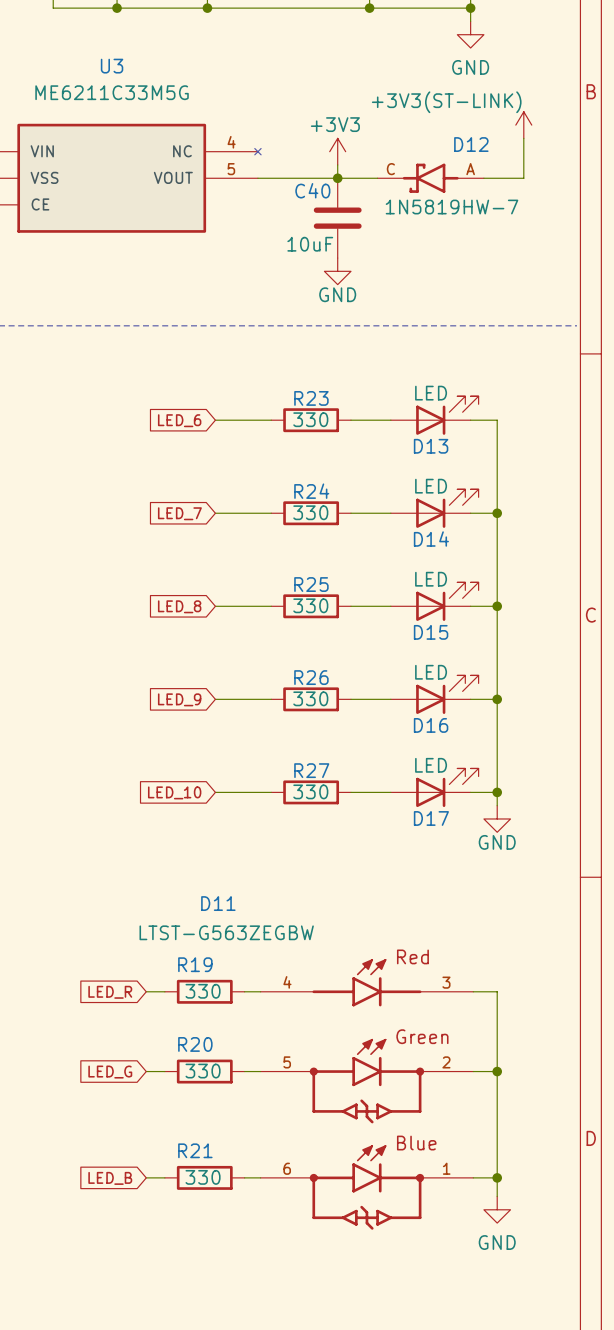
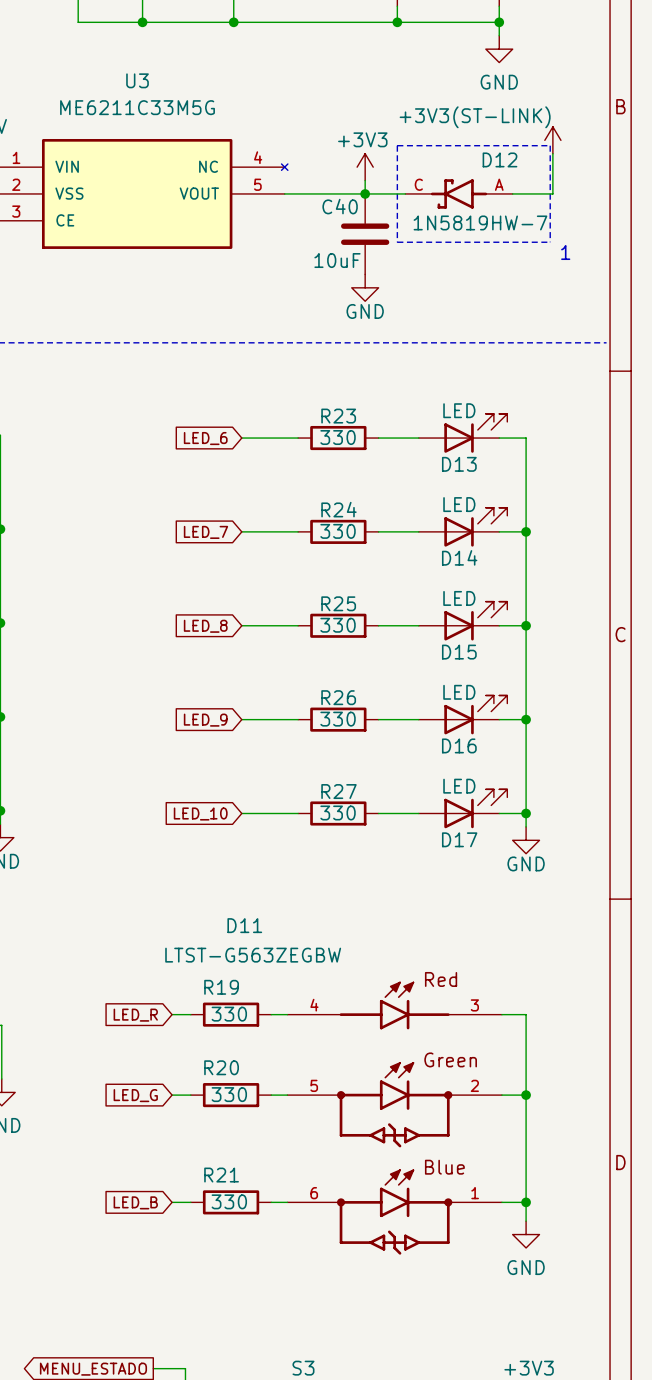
line: none -> (397, 145) (550, 145) (550, 242) (397, 242) (397, 145)
text: none -> 1 (565, 252)

